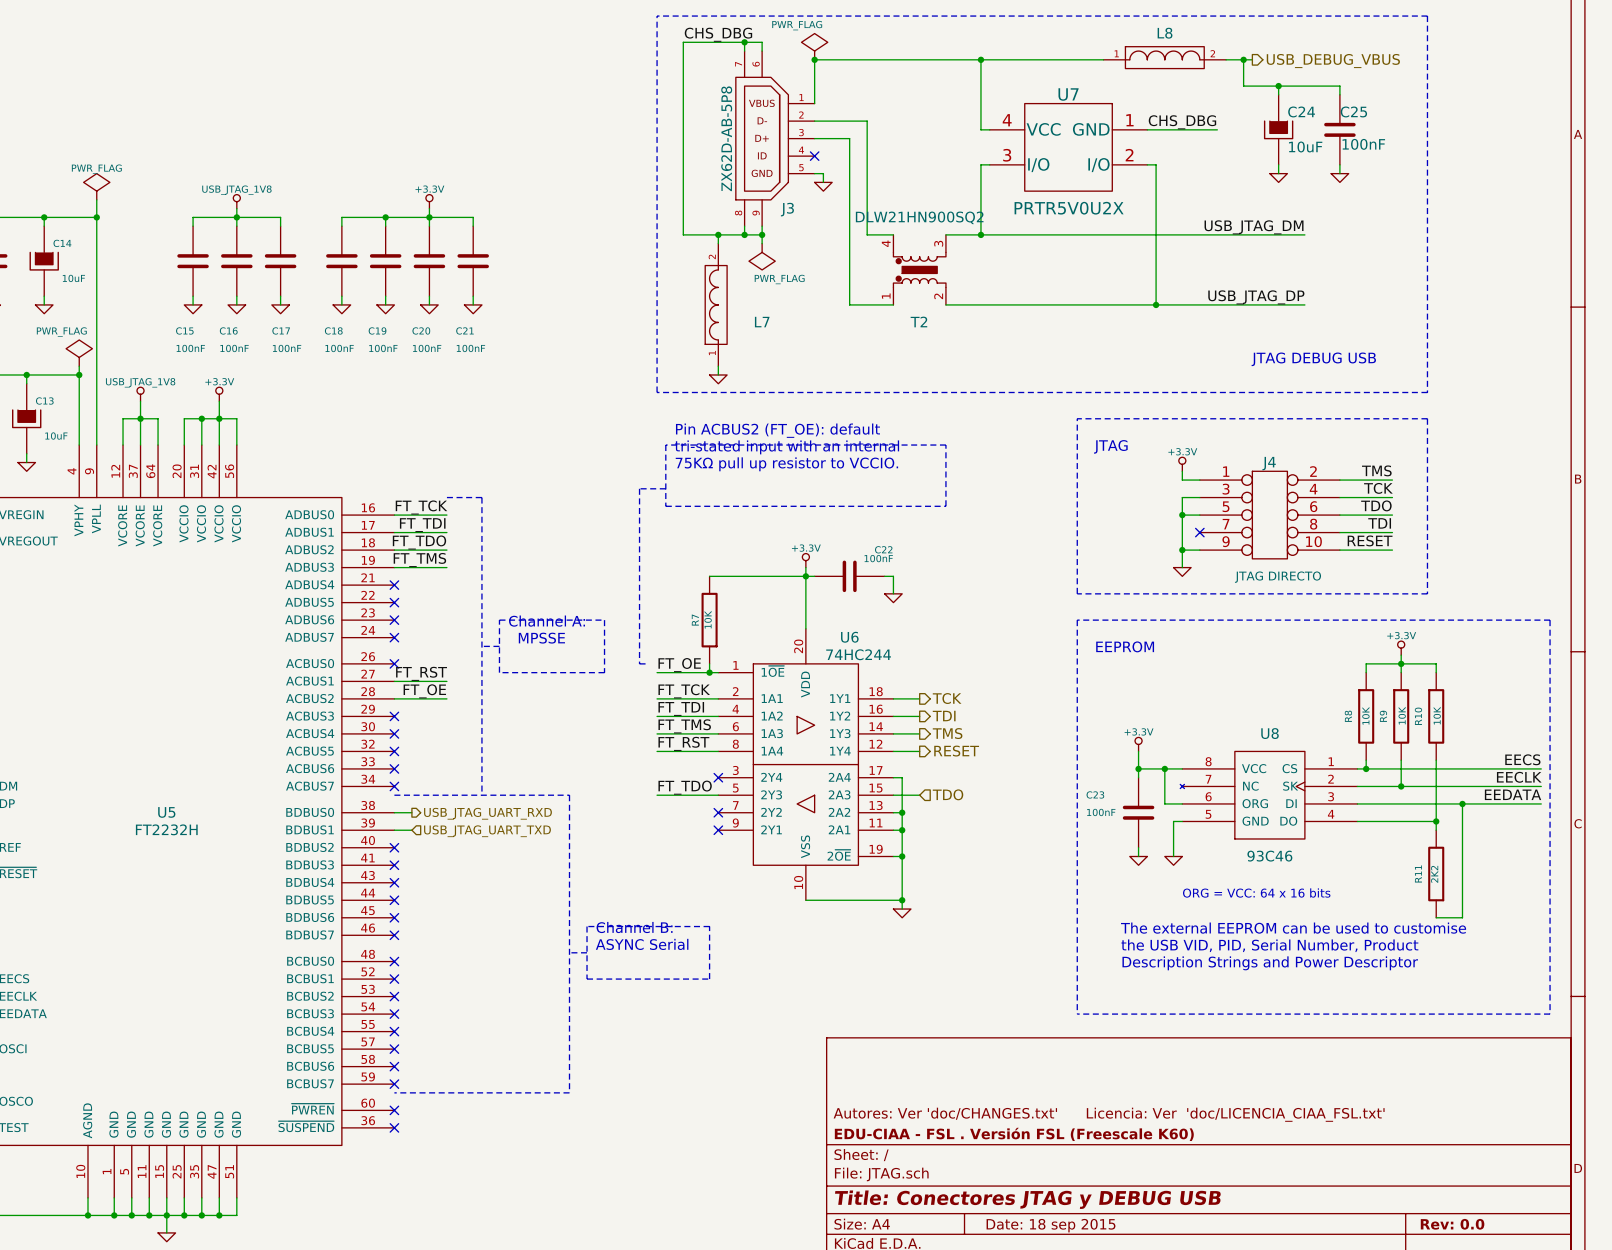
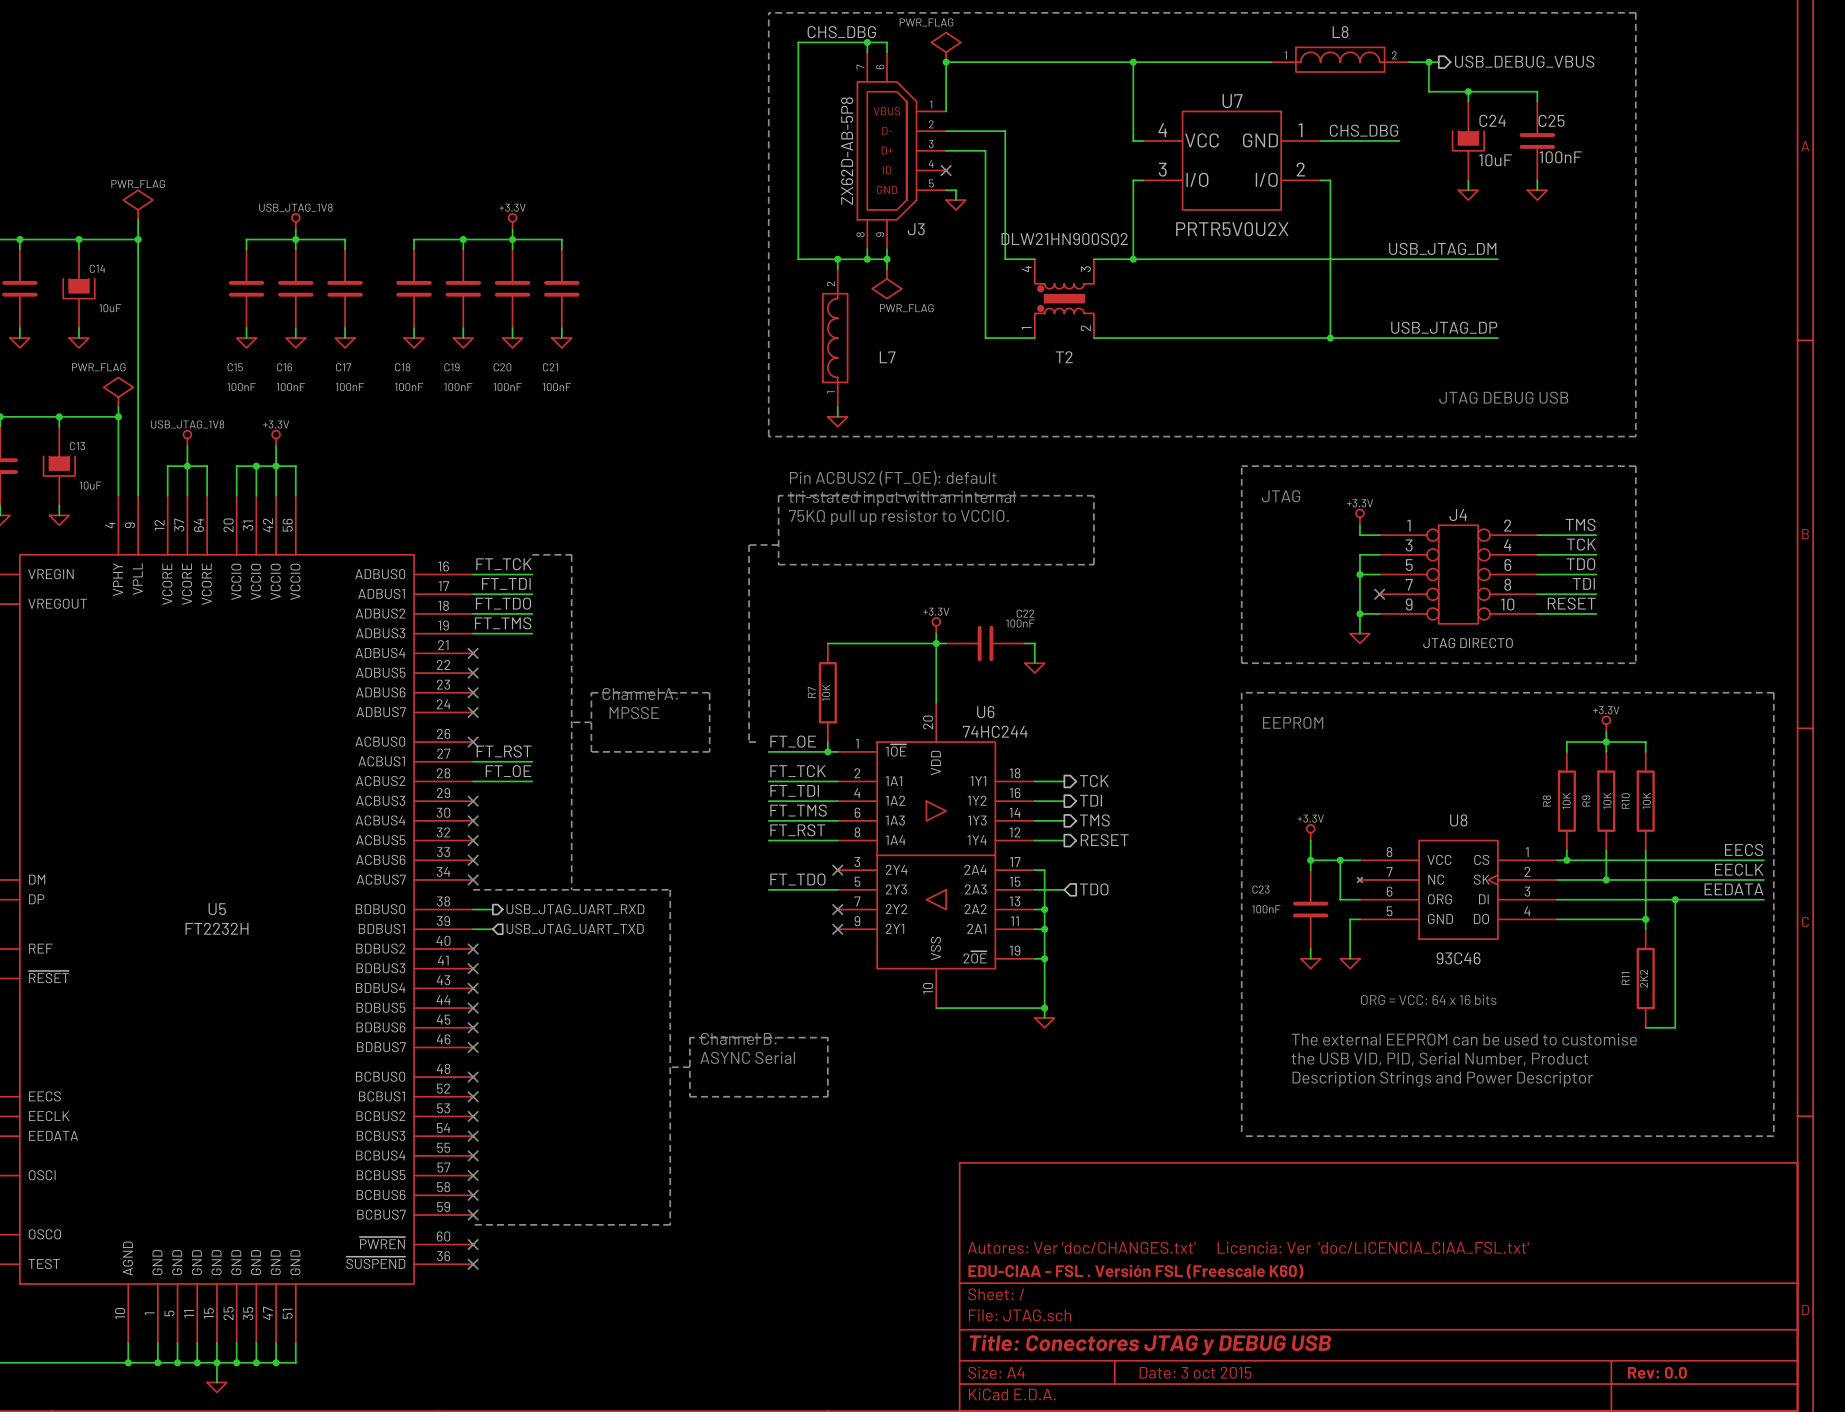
title block: Date: 18 sep 2015 (1051, 1225) -> Date: 3 oct 2015 (1195, 1372)

